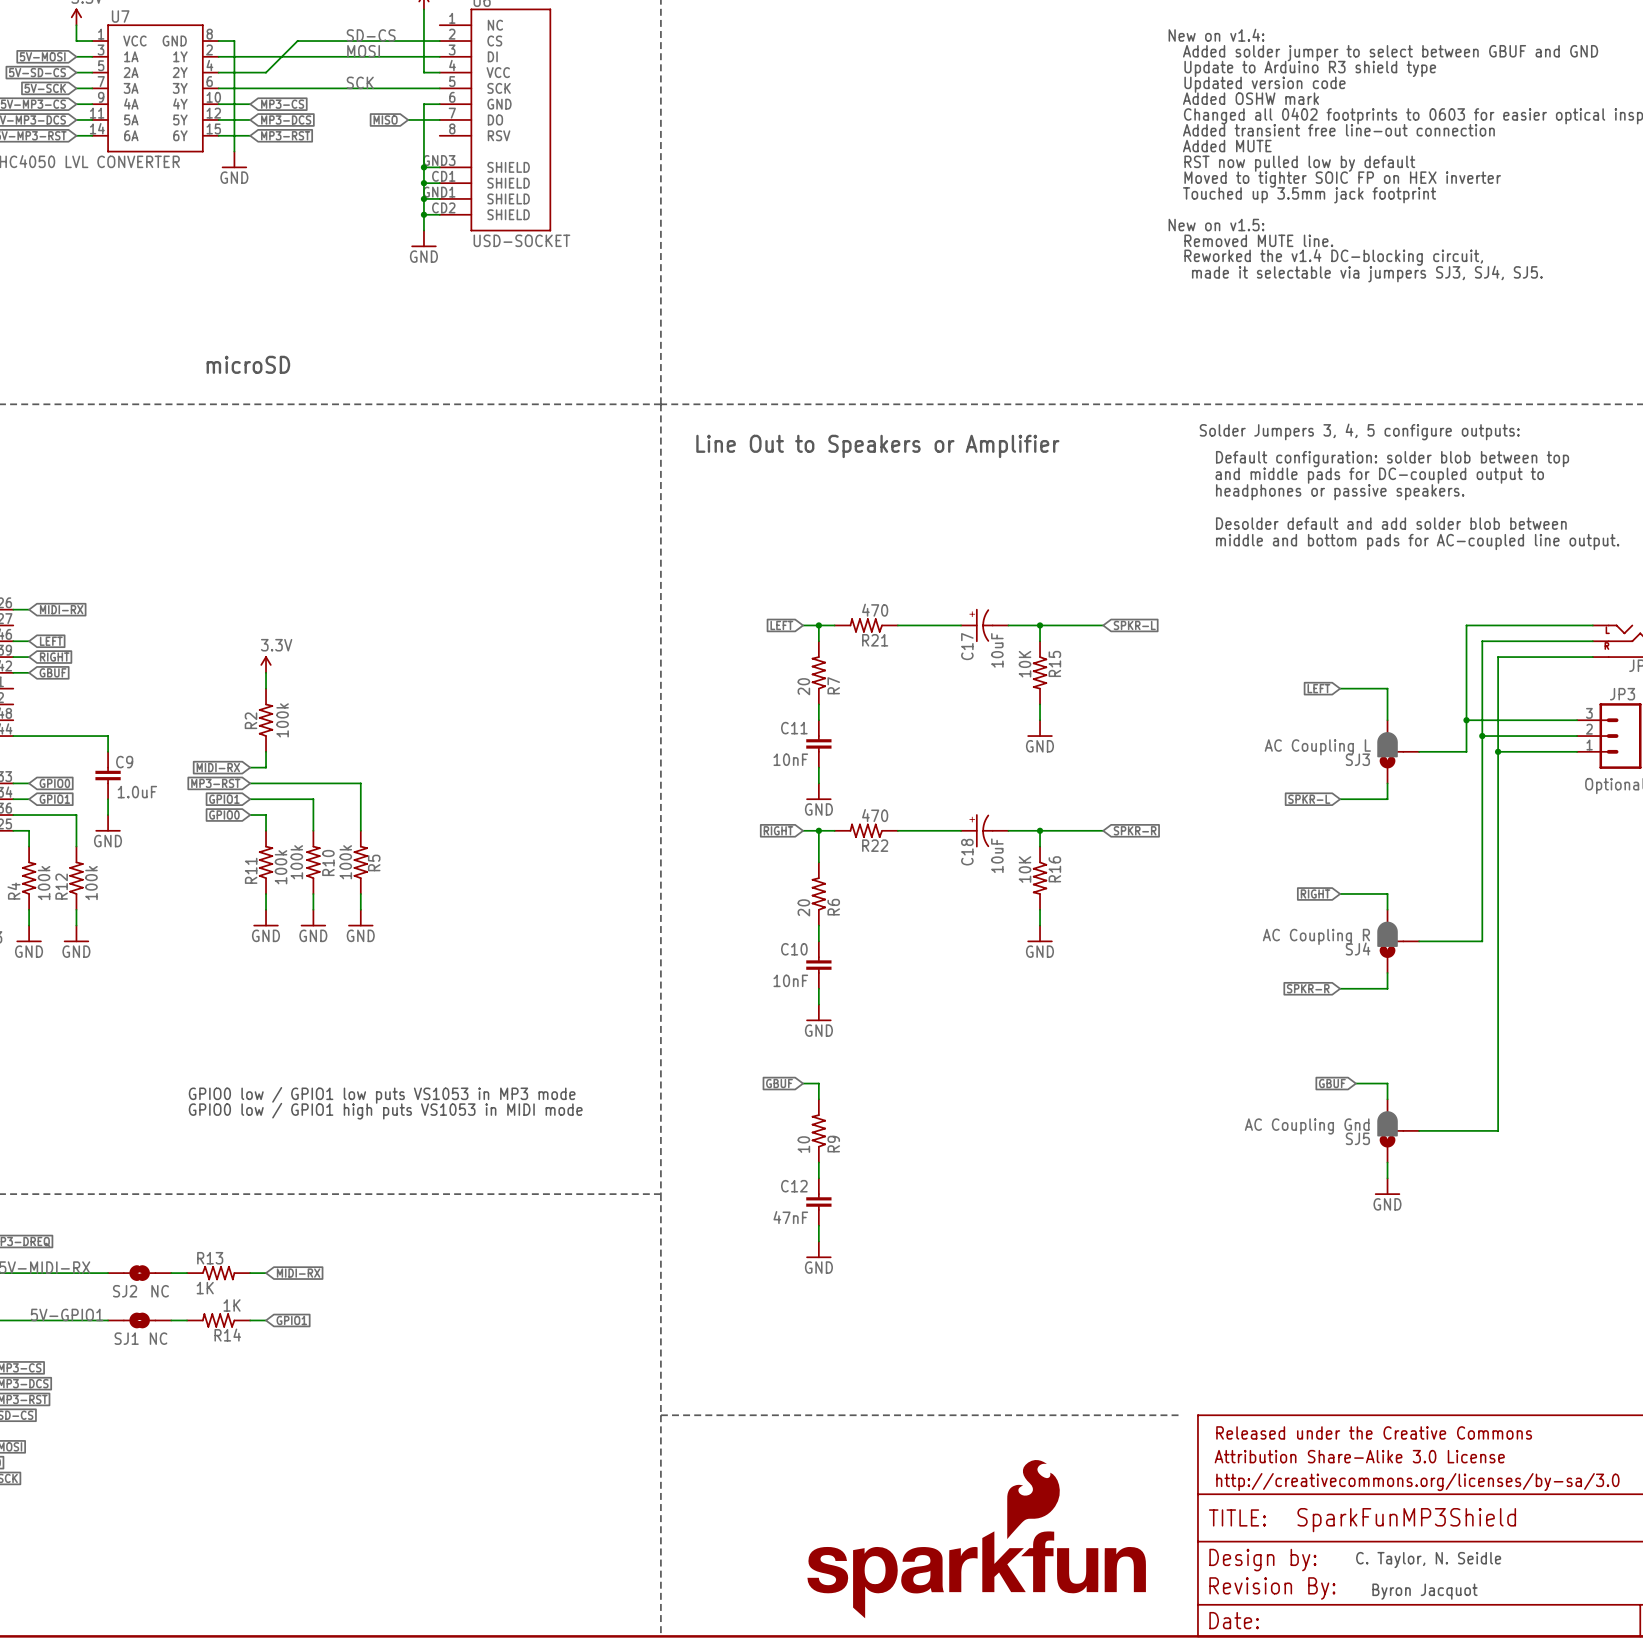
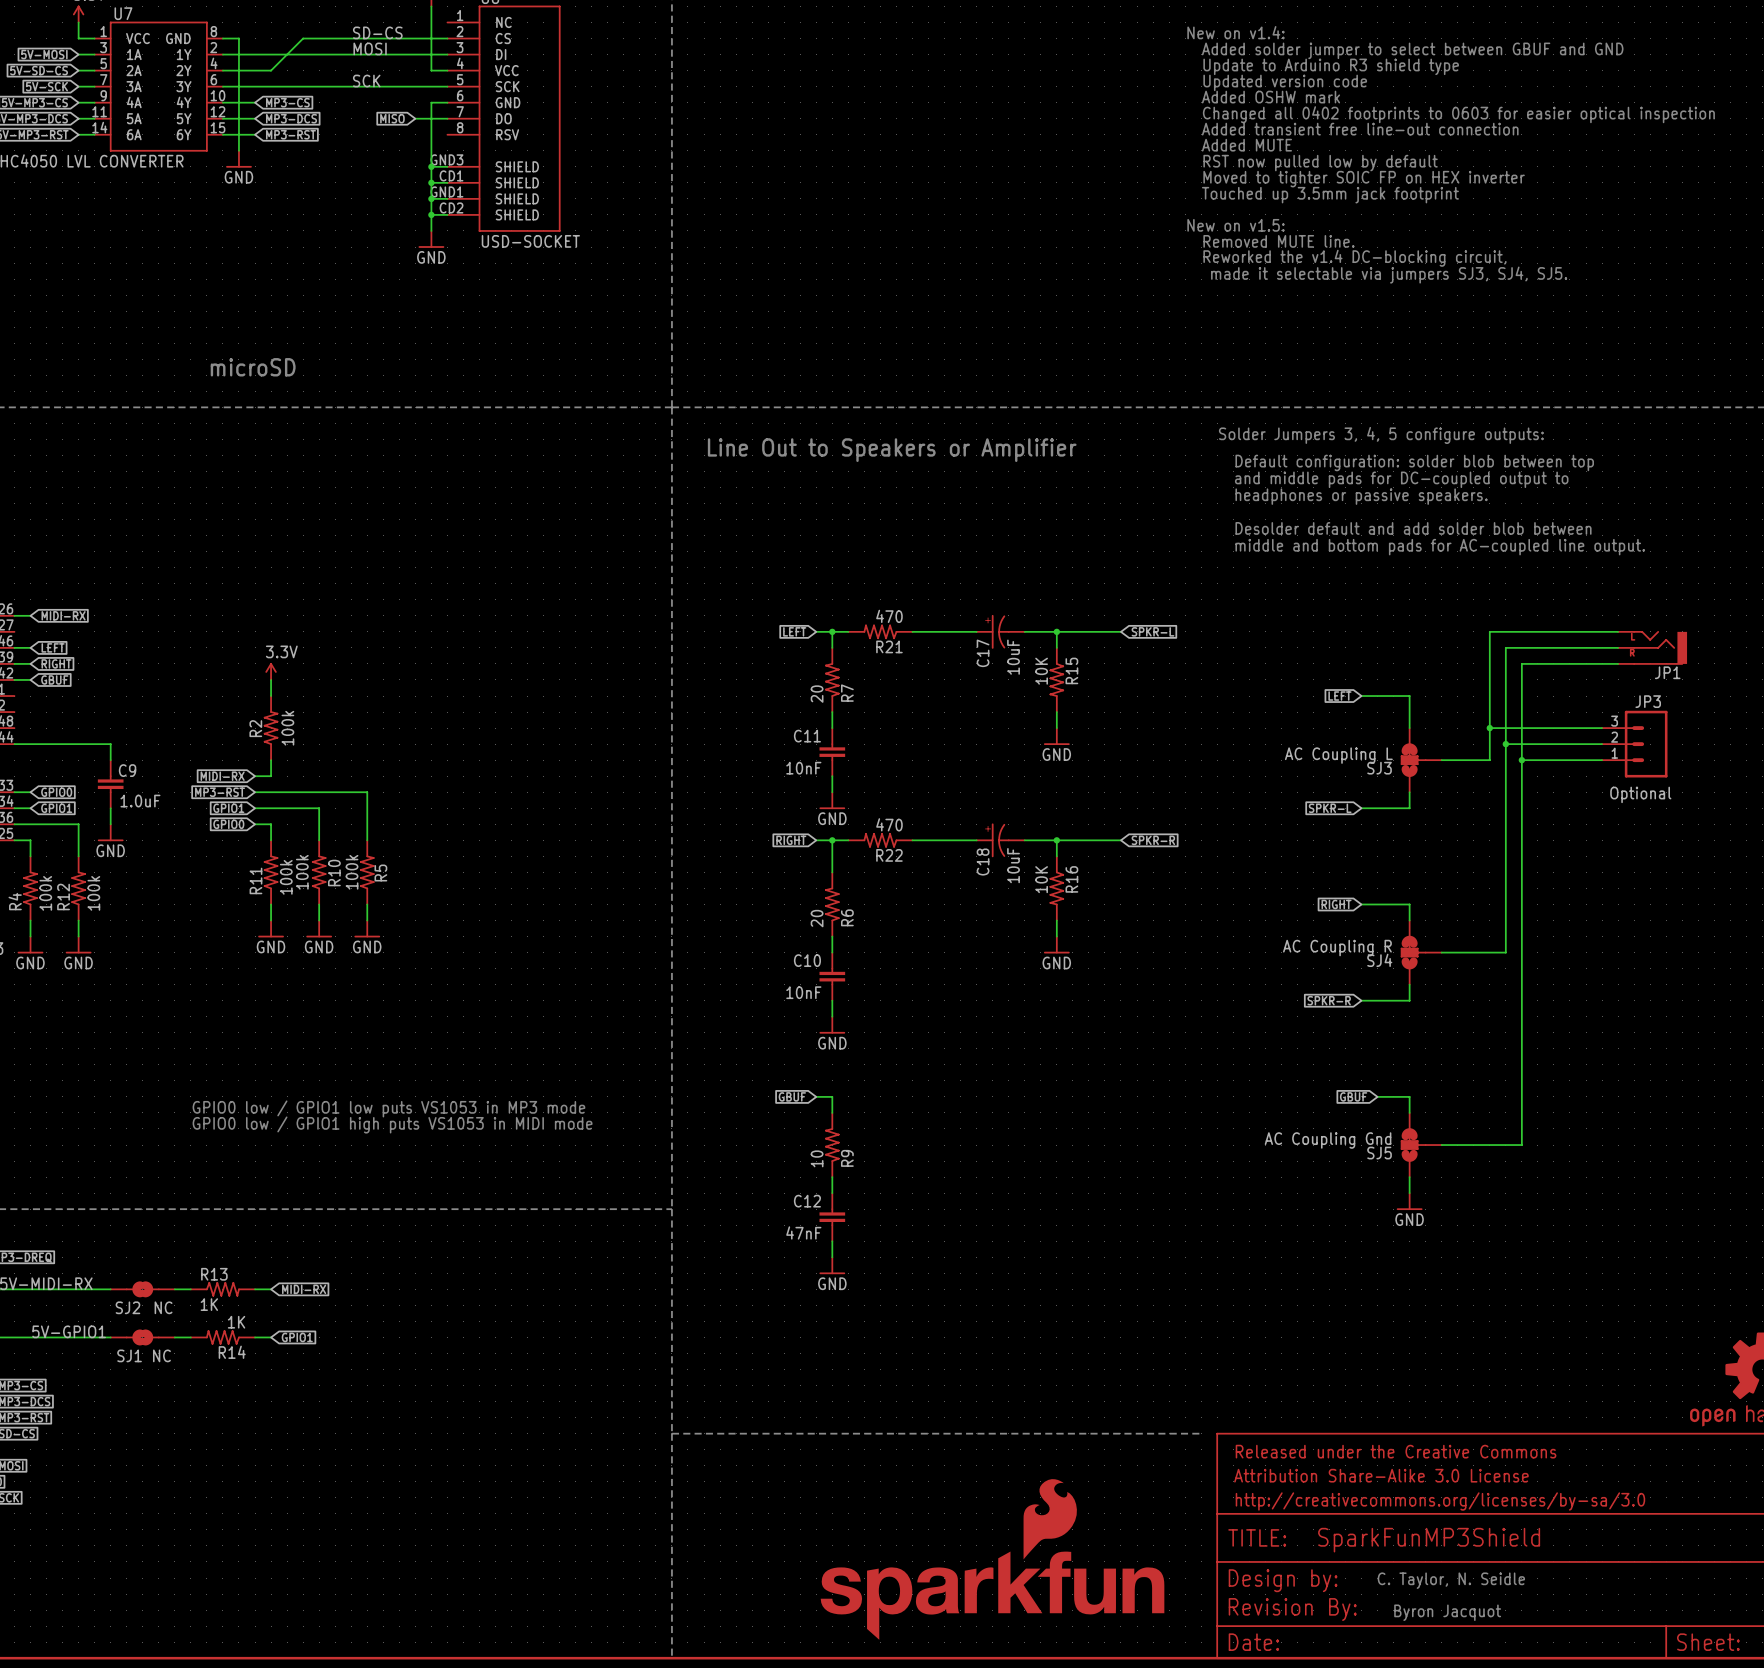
SJ3 symbol: [1377, 720, 1420, 784] -> [1401, 728, 1442, 793]
SJ4 symbol: [1377, 909, 1420, 973] -> [1401, 920, 1442, 985]
SJ5 symbol: [1377, 1099, 1420, 1163] -> [1401, 1112, 1442, 1178]

